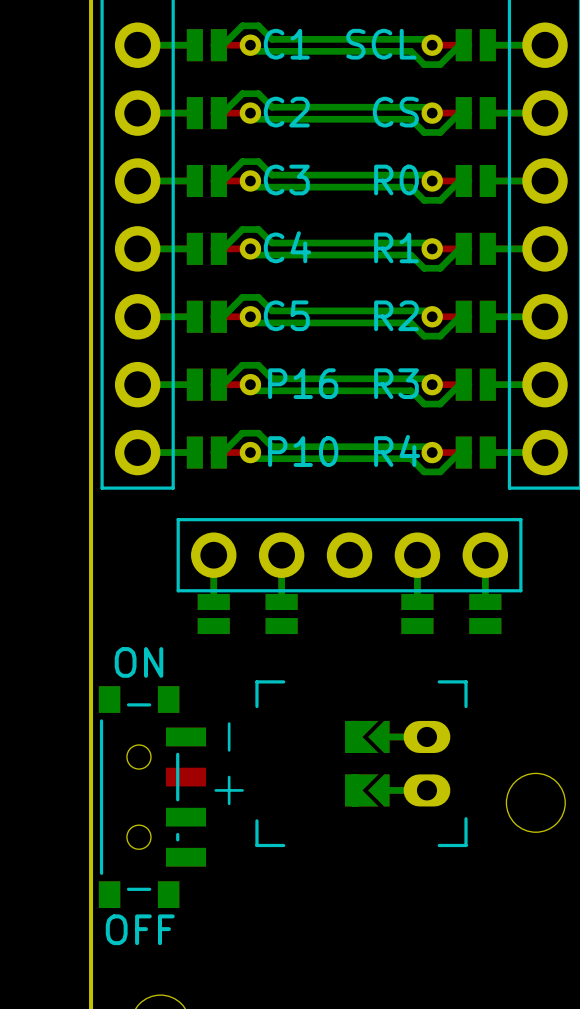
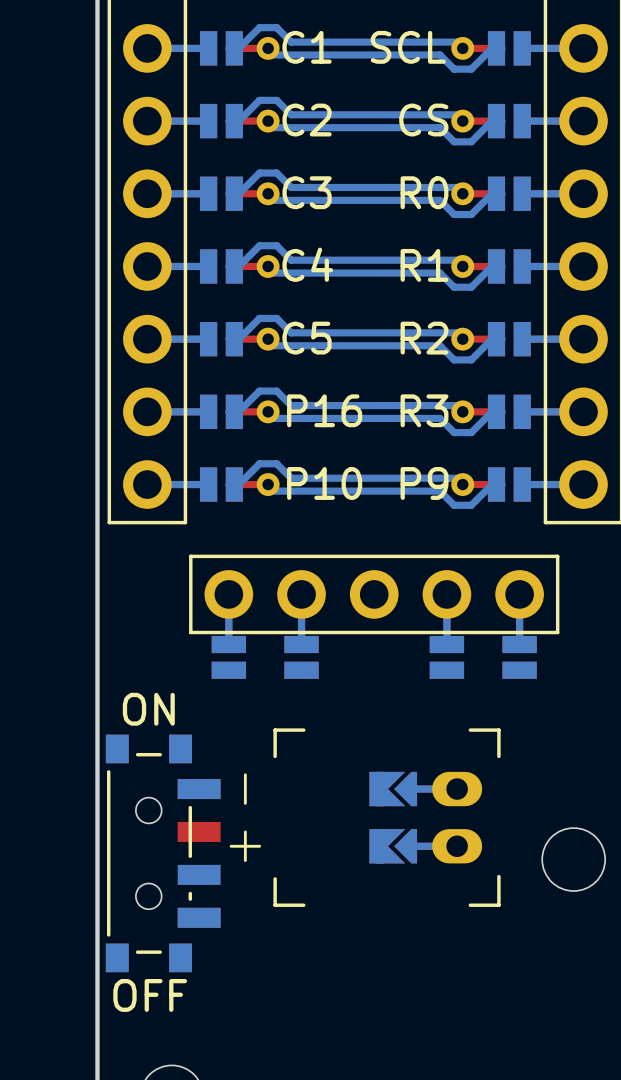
part text: R4 (397, 450) -> P9 (424, 483)

